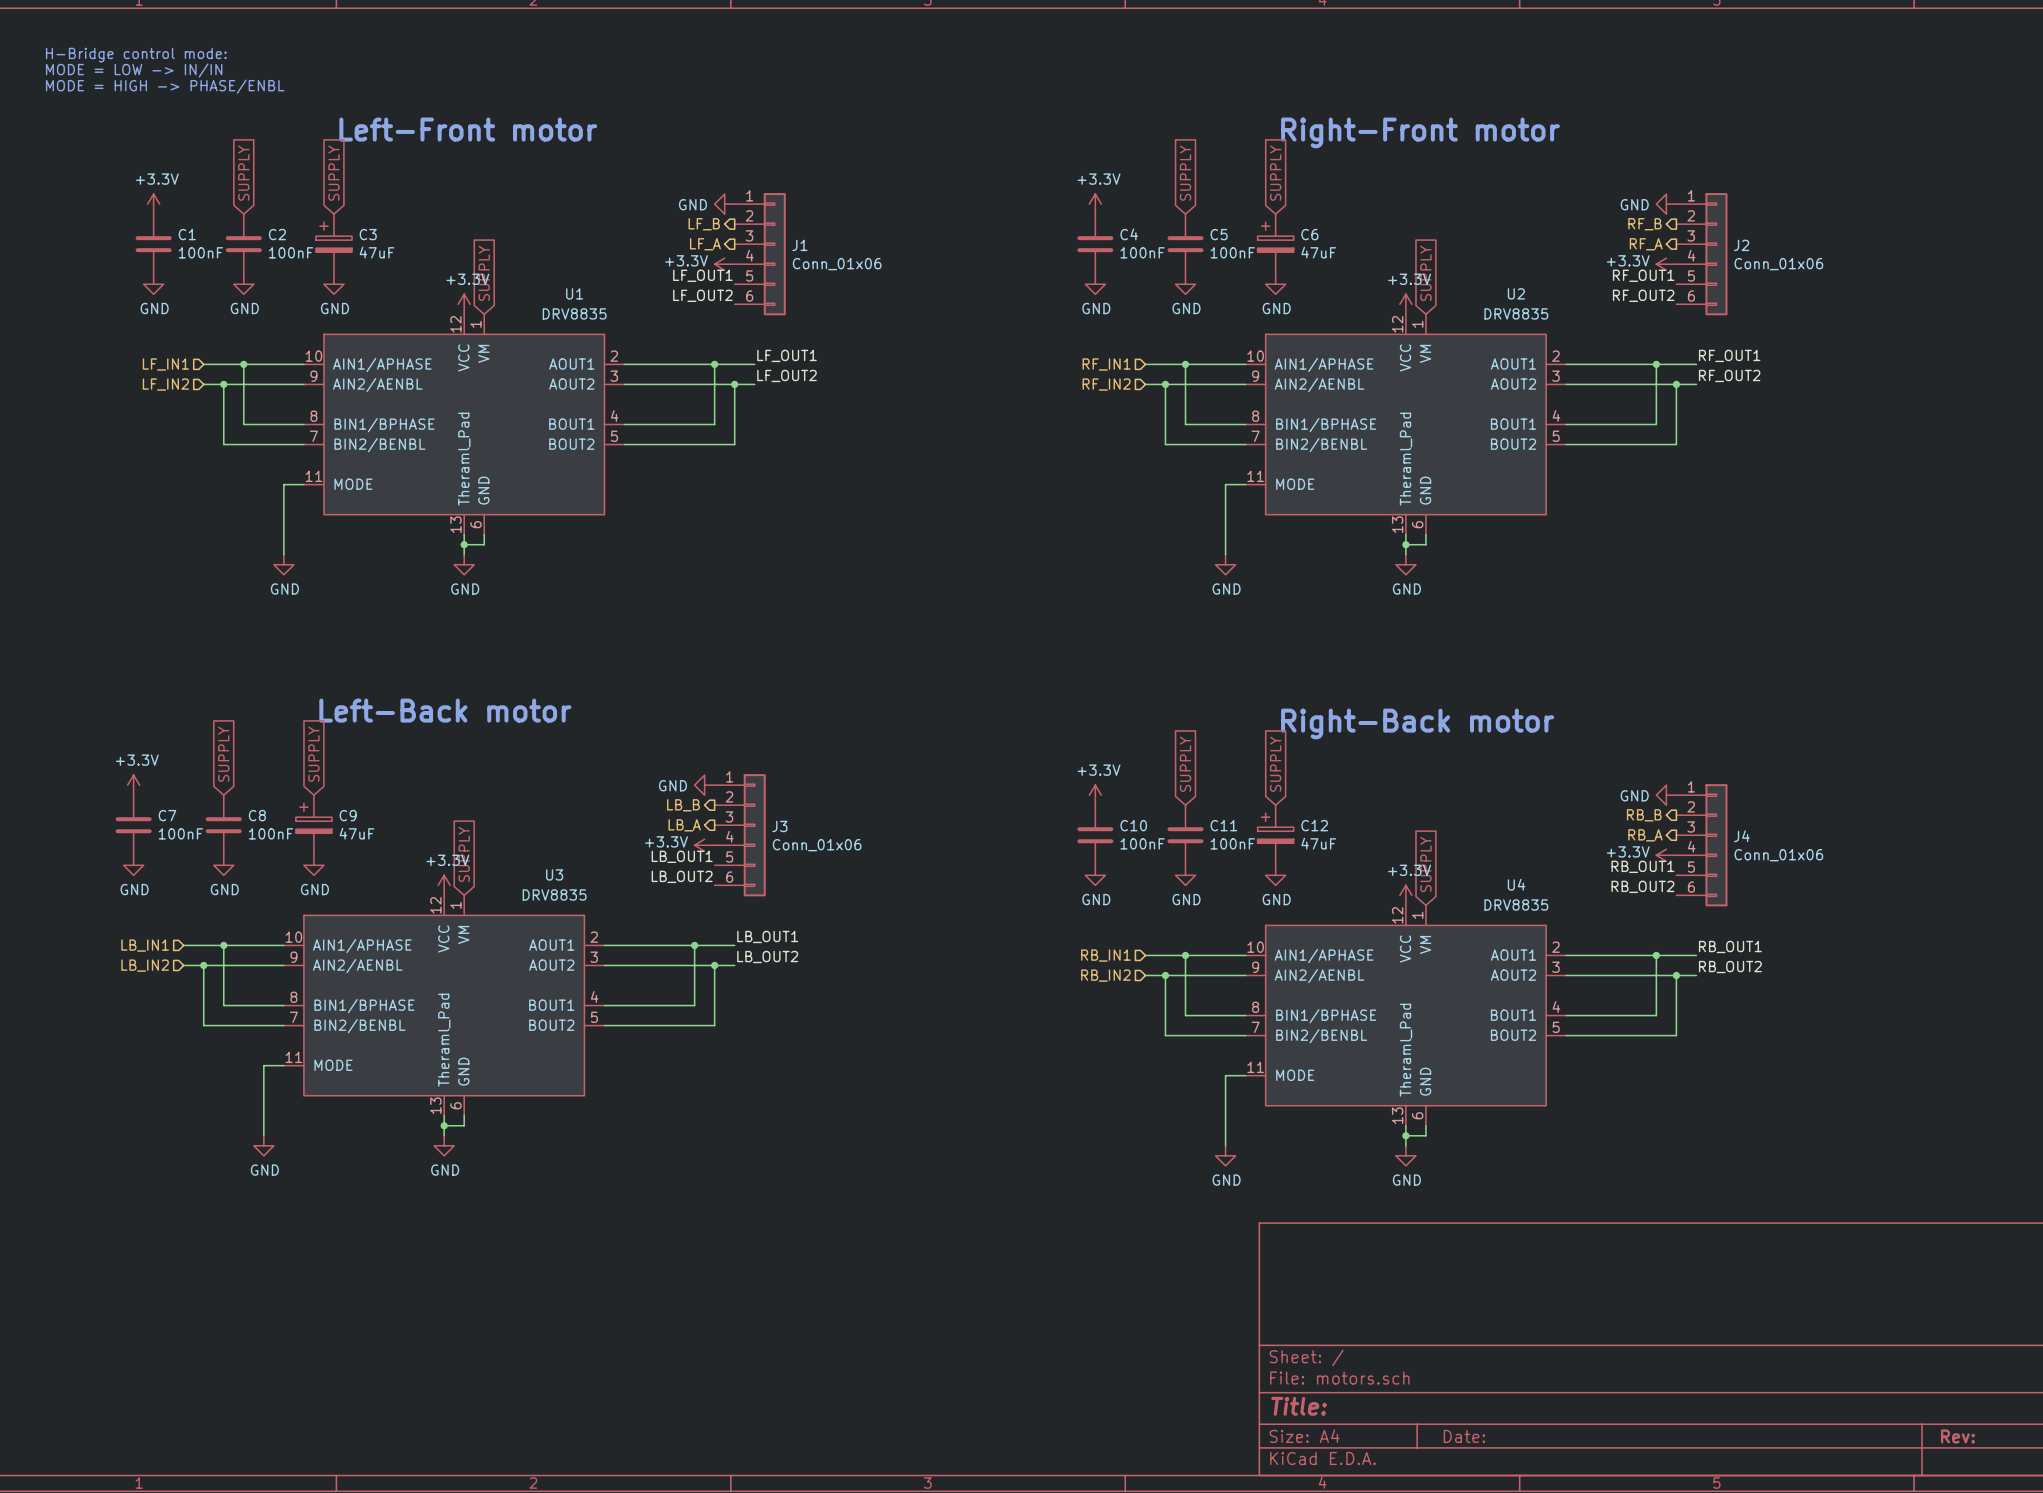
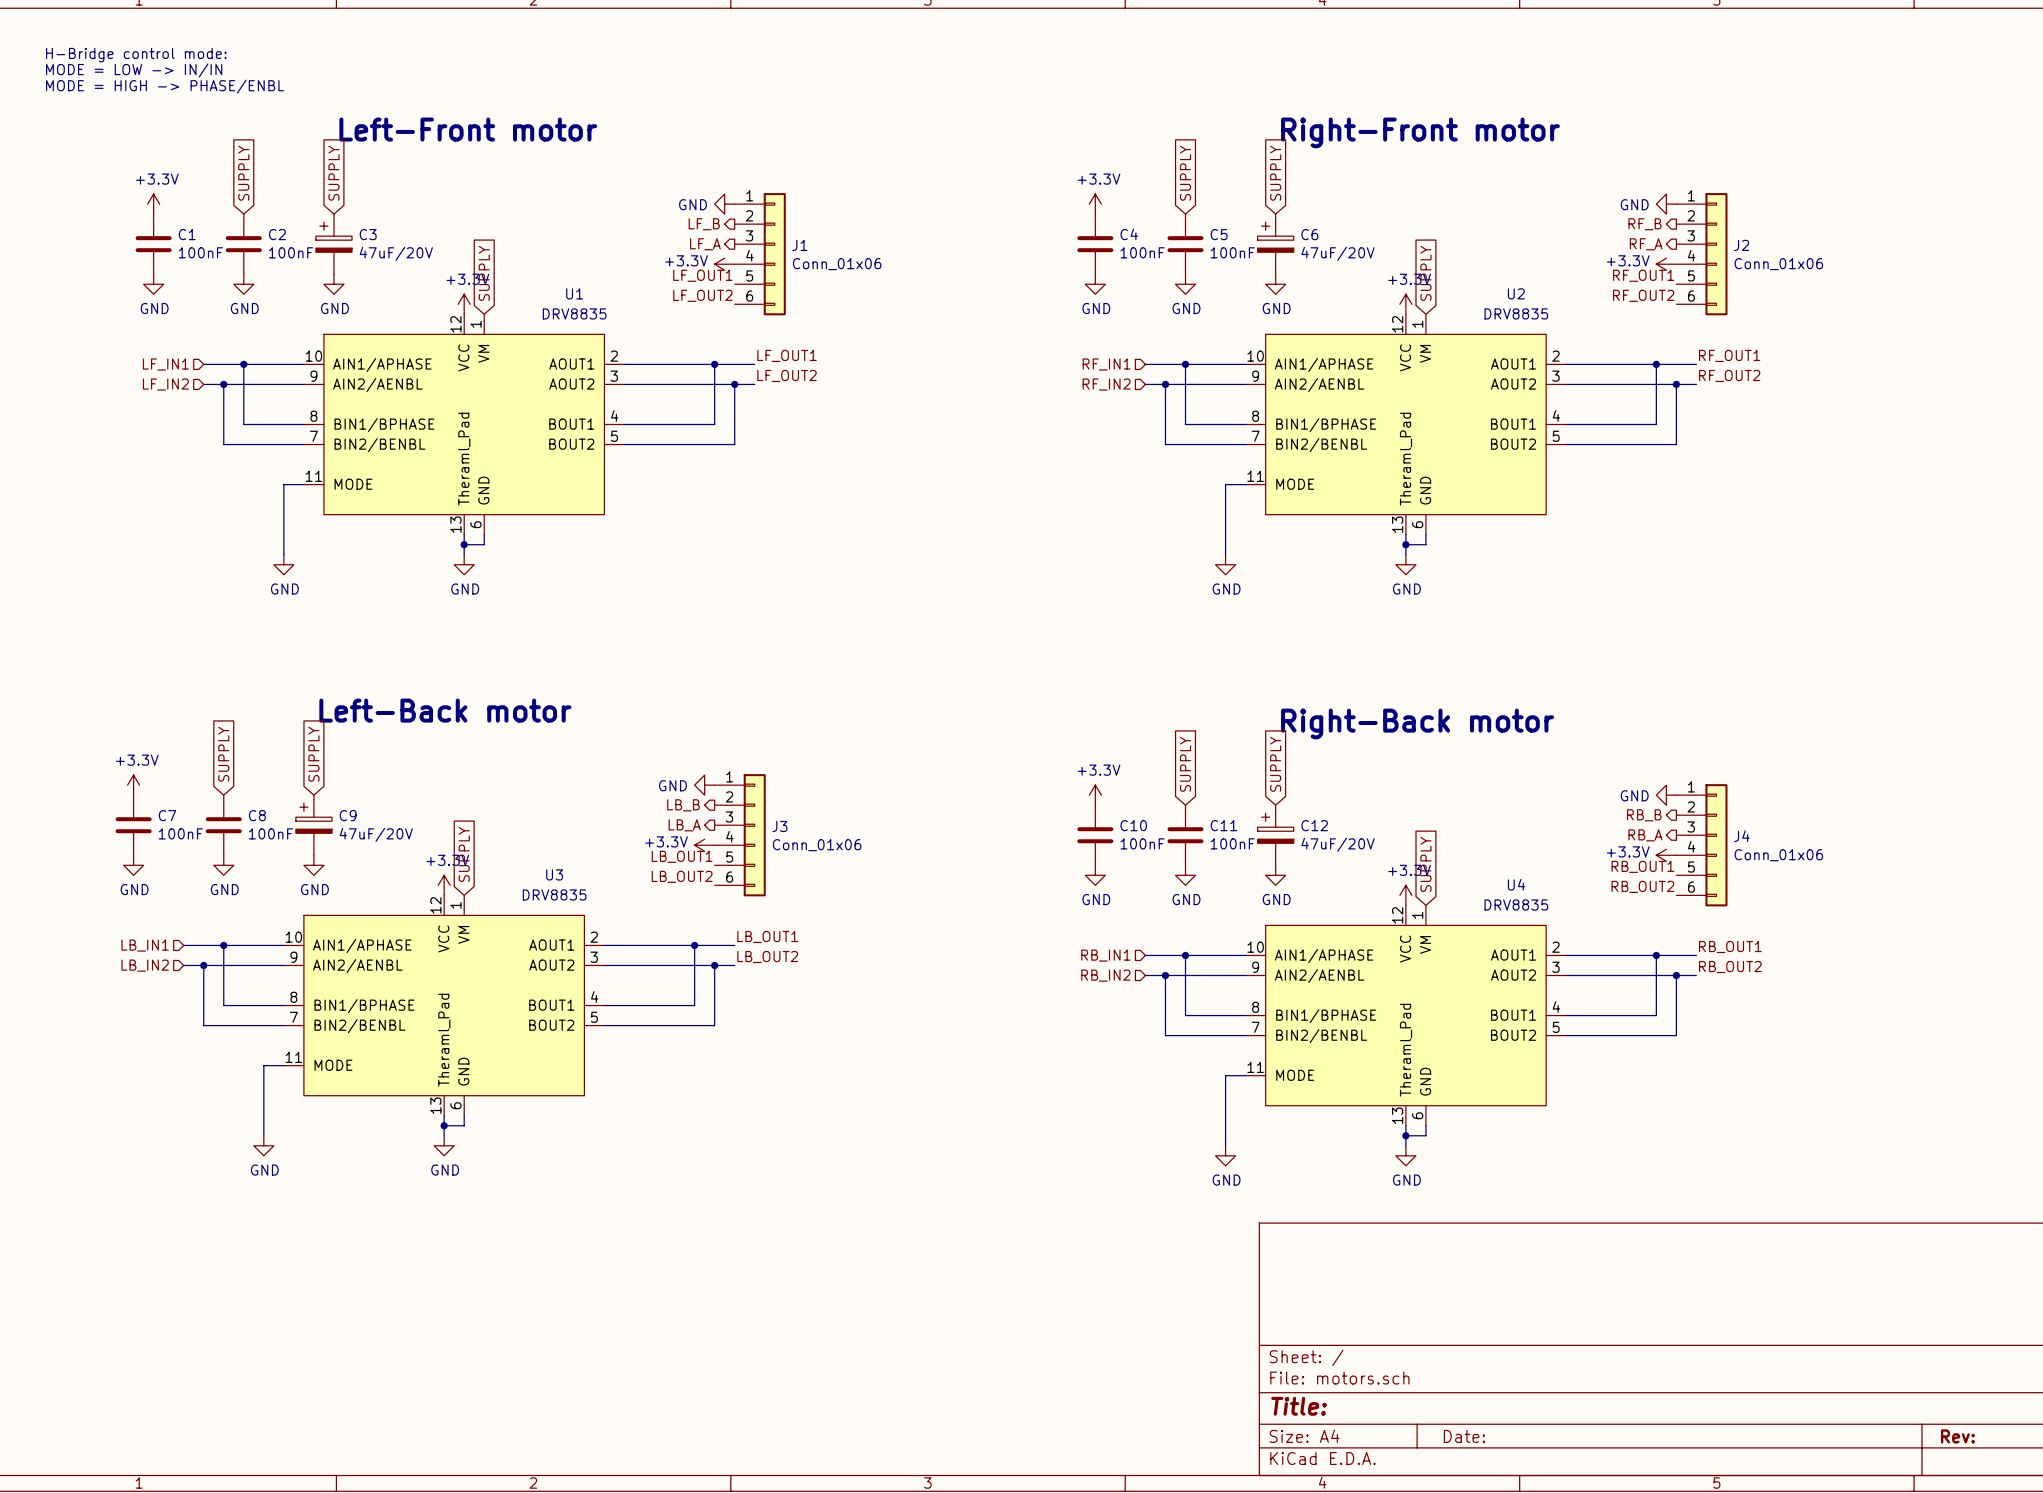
C3 value: 47uF (377, 252) -> 47uF/20V (396, 253)
C6 value: 47uF (1318, 252) -> 47uF/20V (1338, 253)
C9 value: 47uF (356, 833) -> 47uF/20V (376, 834)
C12 value: 47uF (1318, 843) -> 47uF/20V (1338, 844)

